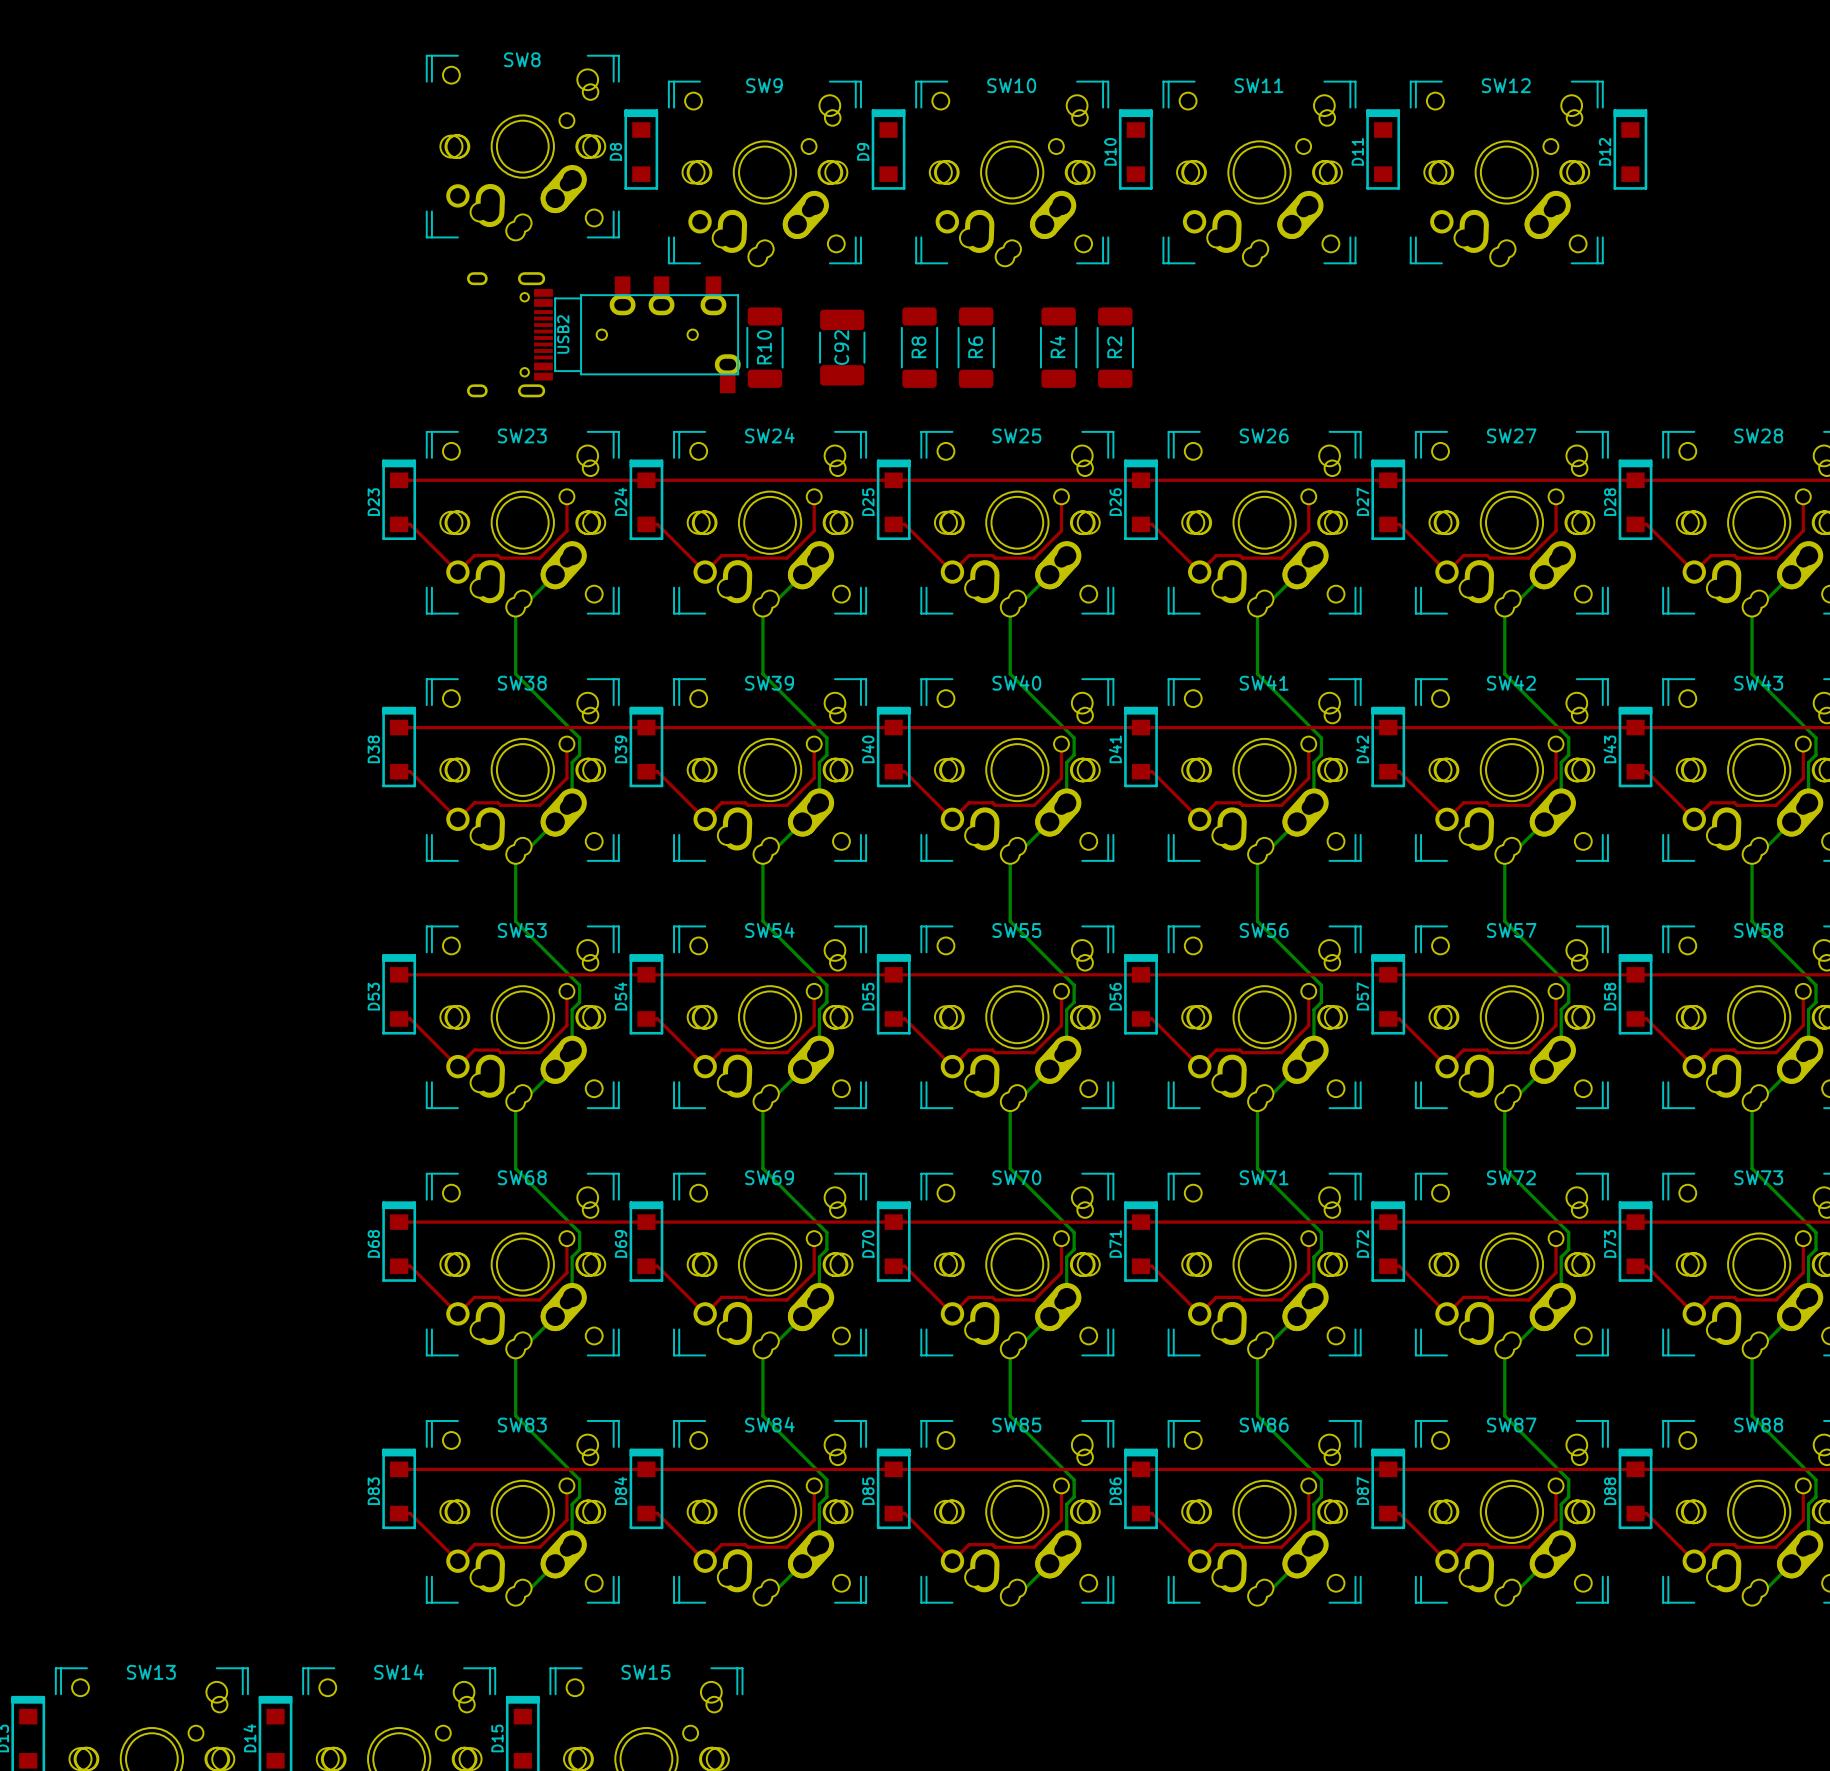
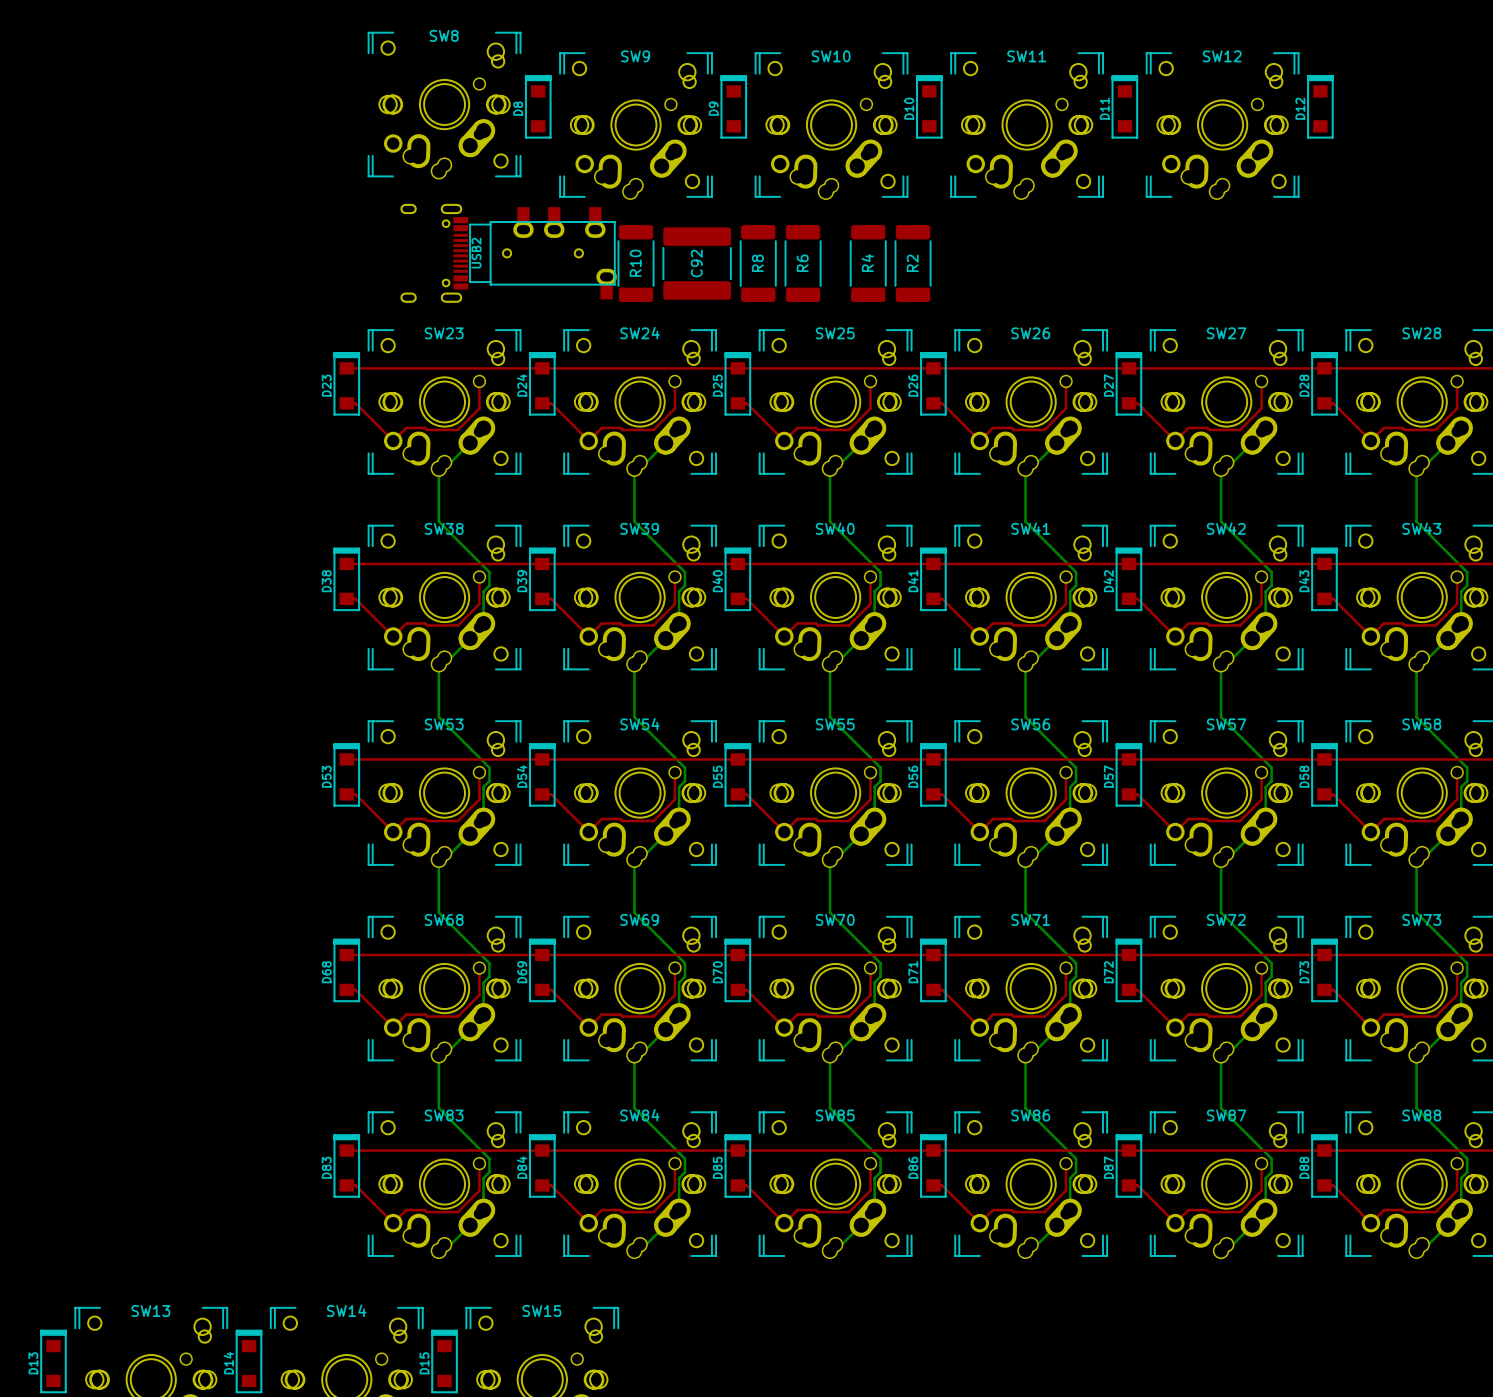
R10 footprint: [746, 307, 784, 388] -> [617, 225, 655, 303]
R8 footprint: [901, 307, 938, 388] -> [740, 225, 777, 303]
R6 footprint: [957, 307, 995, 388] -> [784, 225, 822, 303]
R4 footprint: [1040, 307, 1078, 388] -> [850, 225, 887, 303]
R2 footprint: [1096, 307, 1134, 388] -> [894, 225, 932, 303]
C92 footprint: [819, 309, 866, 386] -> [662, 227, 732, 300]

